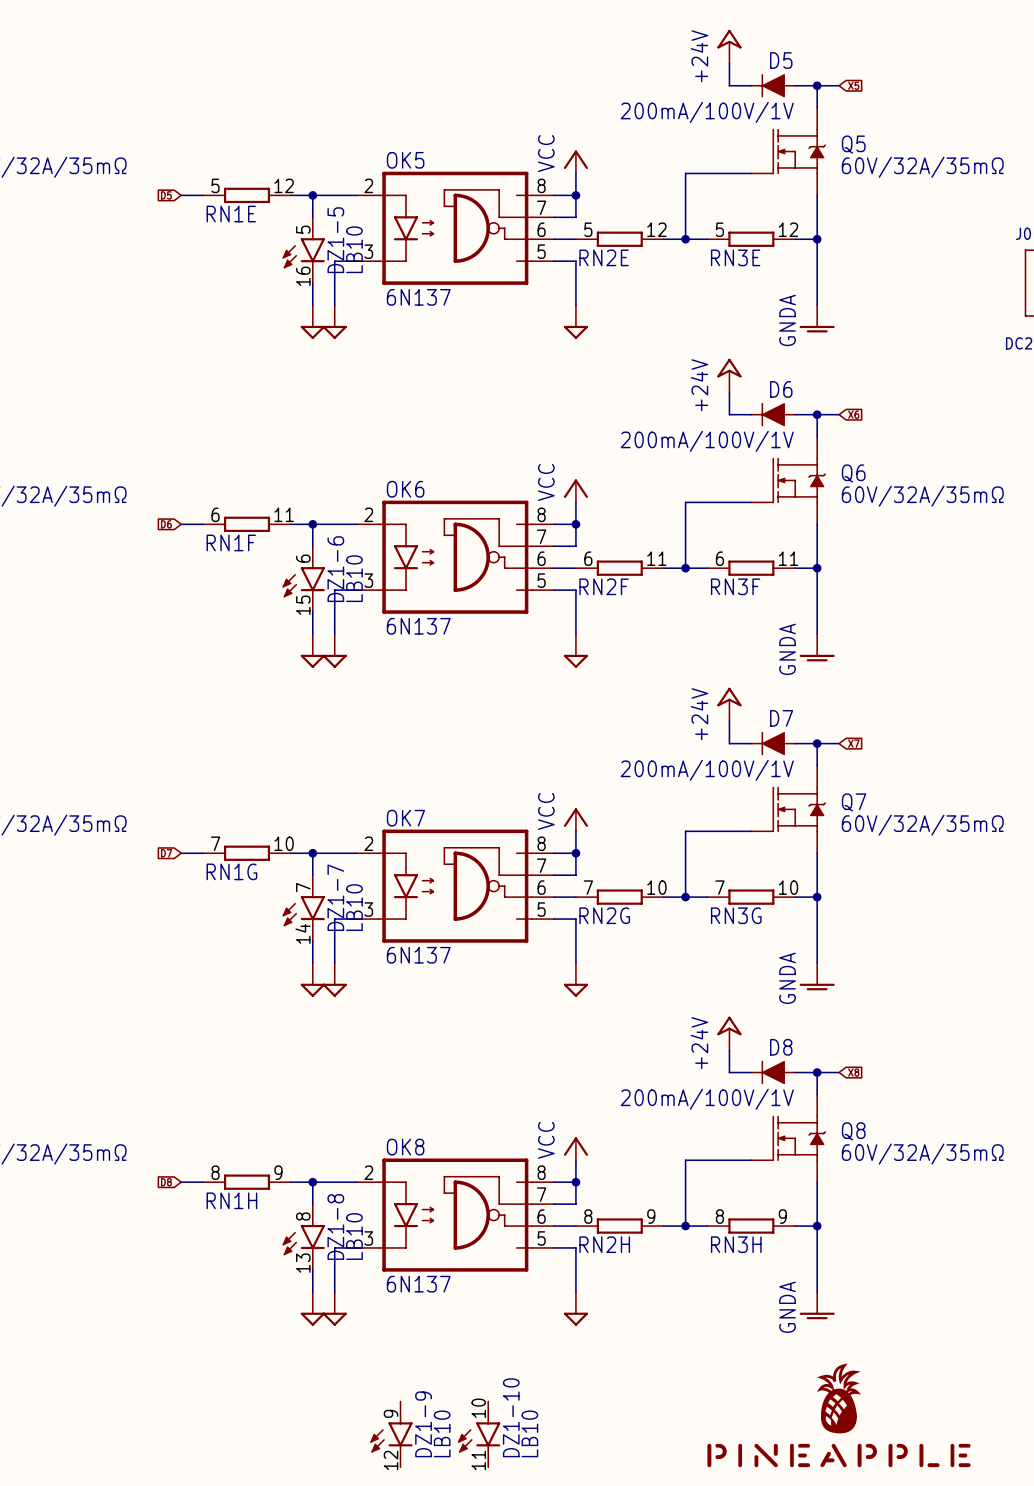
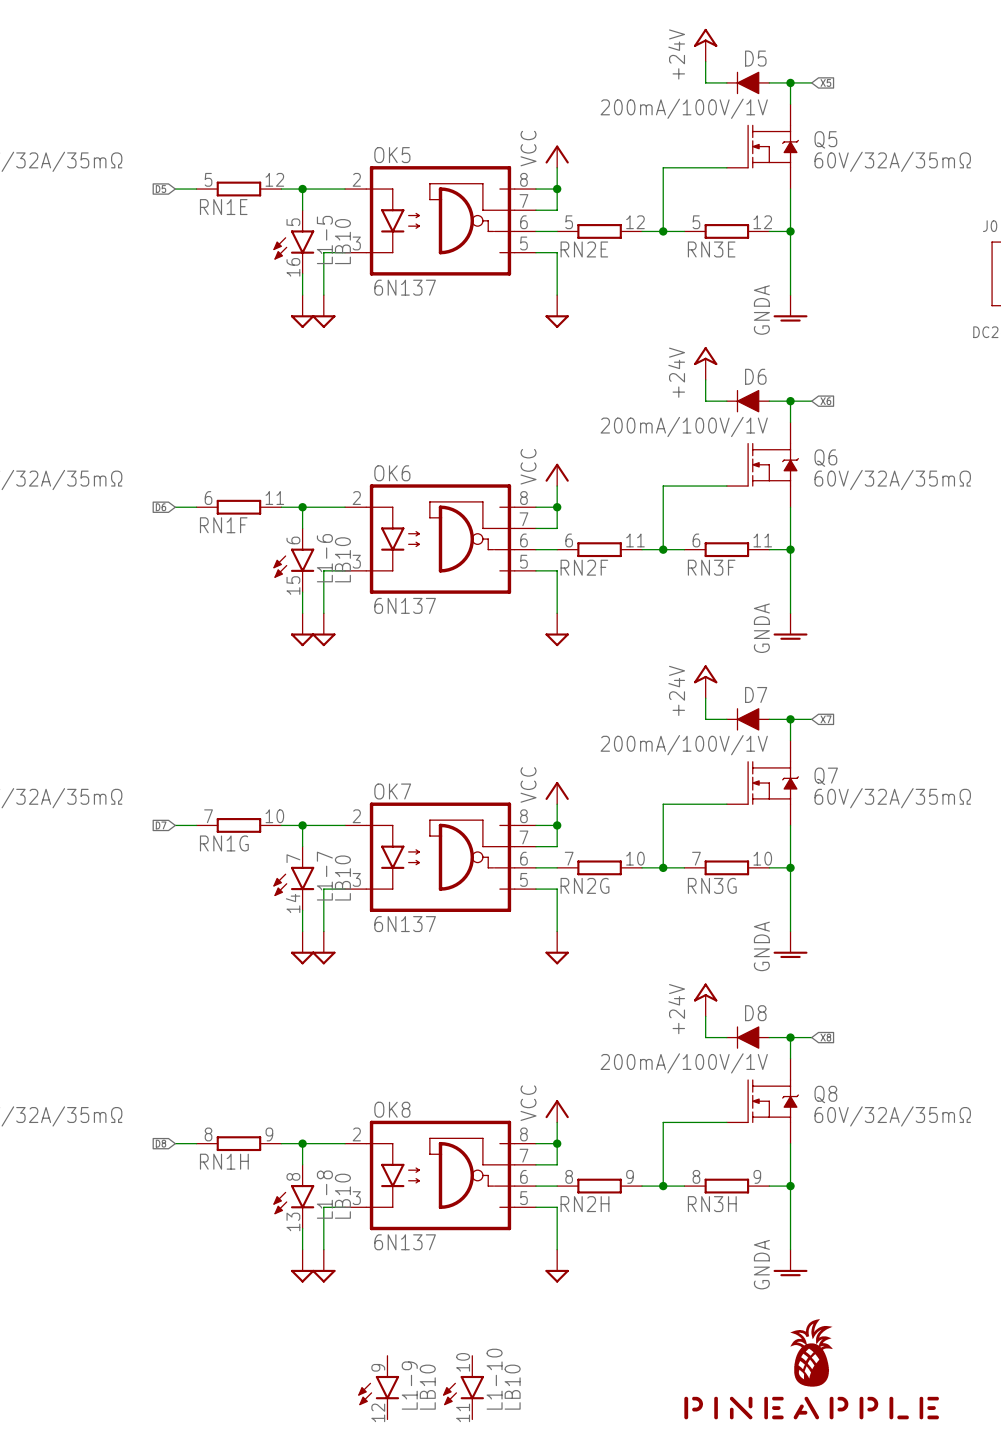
DZ1-5 name: DZ1-5 (335, 240) -> L1-5 (324, 240)
DZ1-6 name: DZ1-6 (335, 569) -> L1-6 (324, 558)
DZ1-7 name: DZ1-7 (335, 897) -> L1-7 (324, 876)
DZ1-8 name: DZ1-8 (335, 1226) -> L1-8 (324, 1194)
DZ1-10 name: DZ1-10 (511, 1417) -> L1-10 (494, 1379)
DZ1-9 name: DZ1-9 (423, 1424) -> L1-9 (409, 1385)

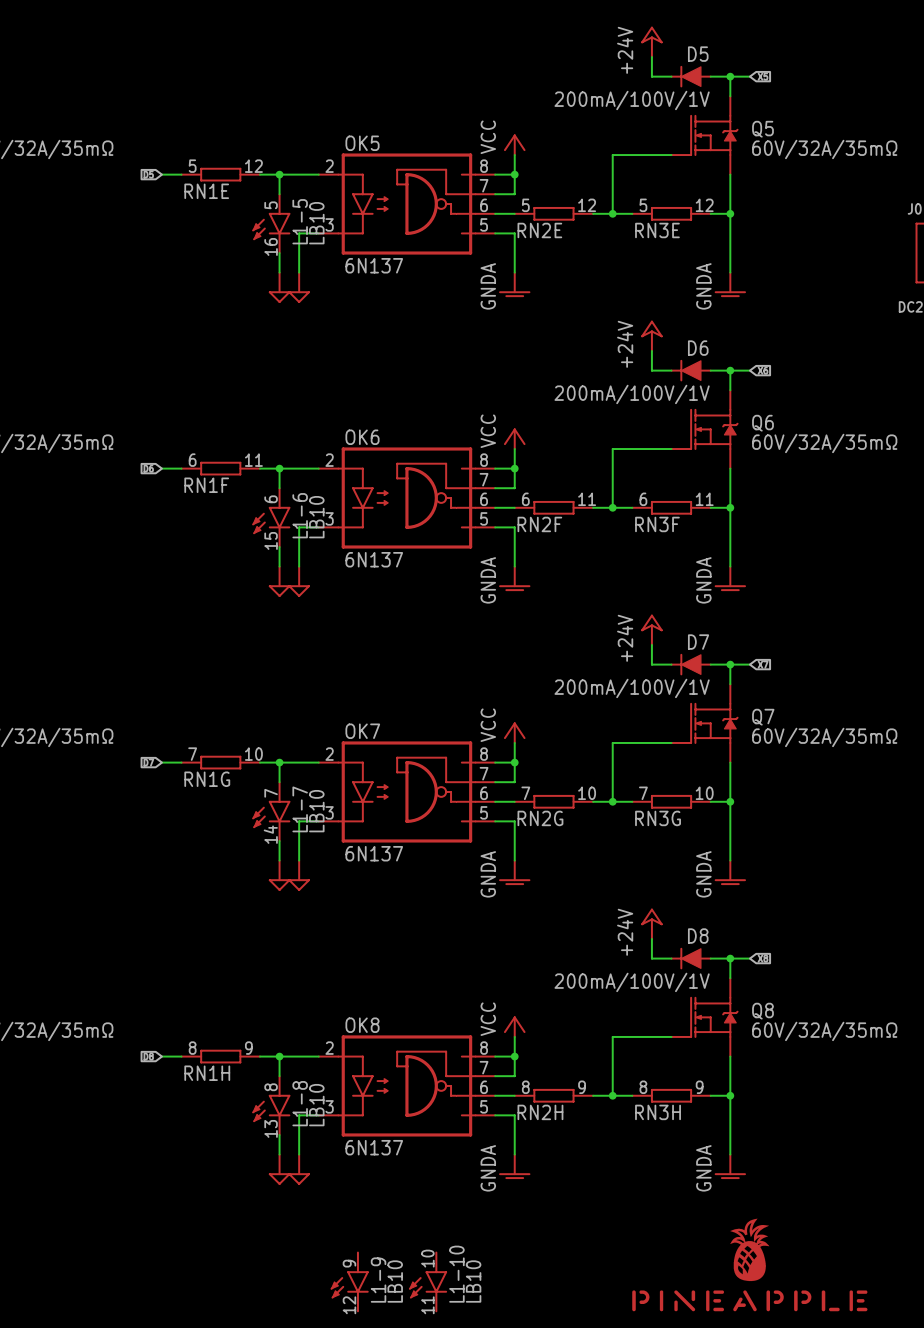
power symbol shape: [545, 295, 569, 328] -> [499, 272, 531, 298]
power symbol text: none -> GNDA (488, 286)
power symbol shape: [545, 613, 569, 647] -> [499, 566, 531, 592]
power symbol text: none -> GNDA (488, 580)
power symbol shape: [545, 931, 569, 965] -> [499, 860, 531, 886]
power symbol text: none -> GNDA (488, 874)
power symbol shape: [545, 1249, 569, 1283] -> [499, 1154, 531, 1180]
power symbol text: none -> GNDA (488, 1168)

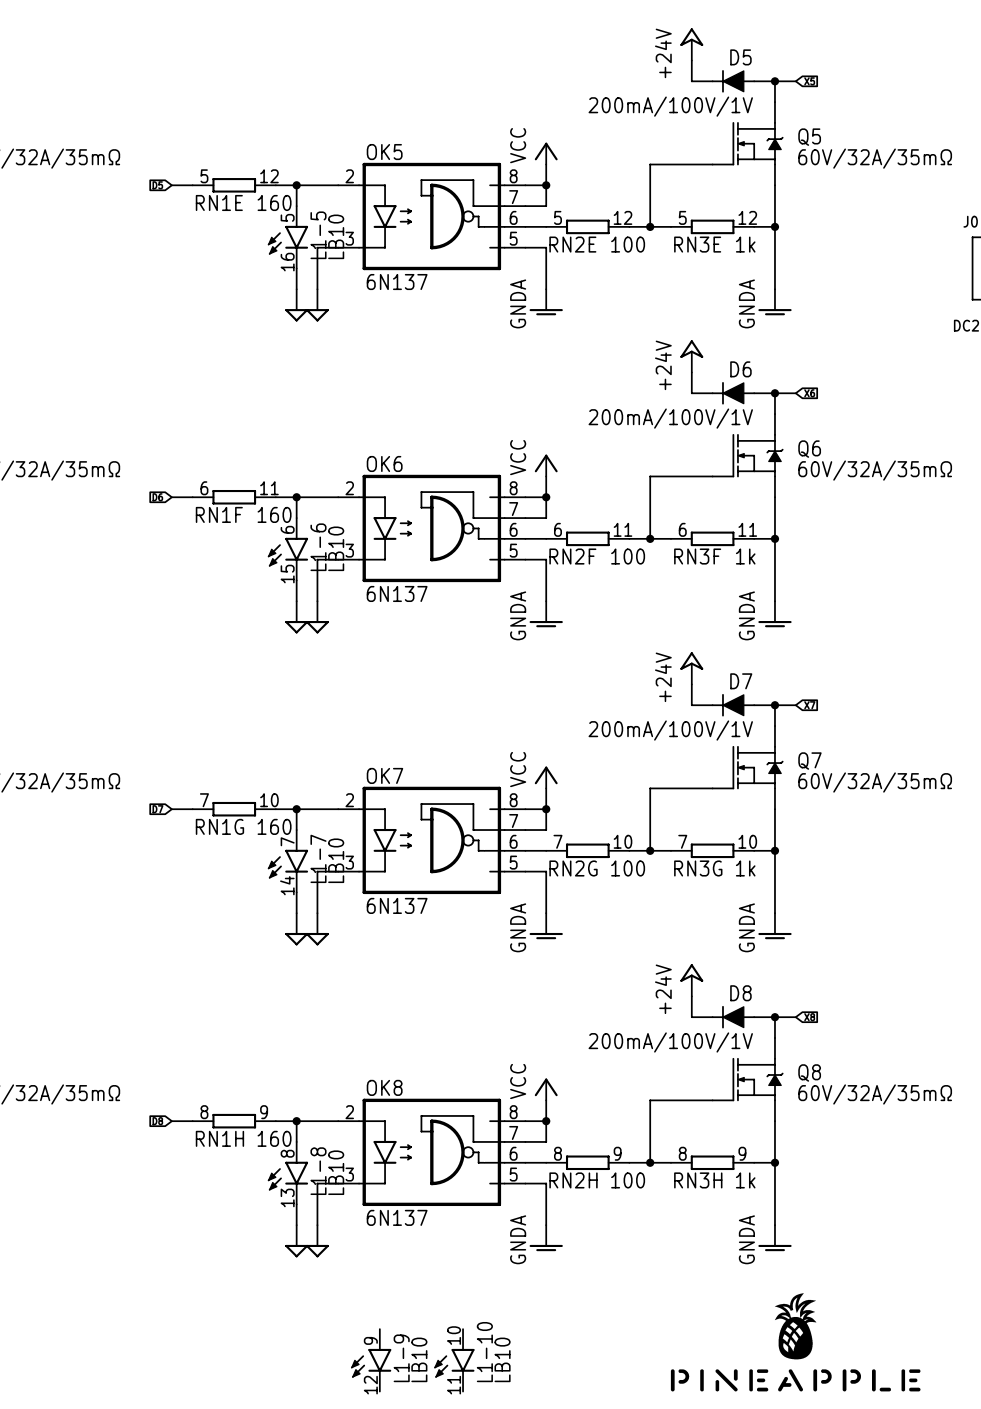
RN1E value: none -> 160 (274, 202)
RN2E value: none -> 100 (628, 244)
RN3E value: none -> 1k (745, 244)
RN1F value: none -> 160 (274, 514)
RN2F value: none -> 100 (628, 556)
RN3F value: none -> 1k (745, 556)
RN1G value: none -> 160 (274, 826)
RN2G value: none -> 100 (628, 868)
RN3G value: none -> 1k (745, 868)
RN1H value: none -> 160 (274, 1138)
RN2H value: none -> 100 (628, 1180)
RN3H value: none -> 1k (745, 1180)

